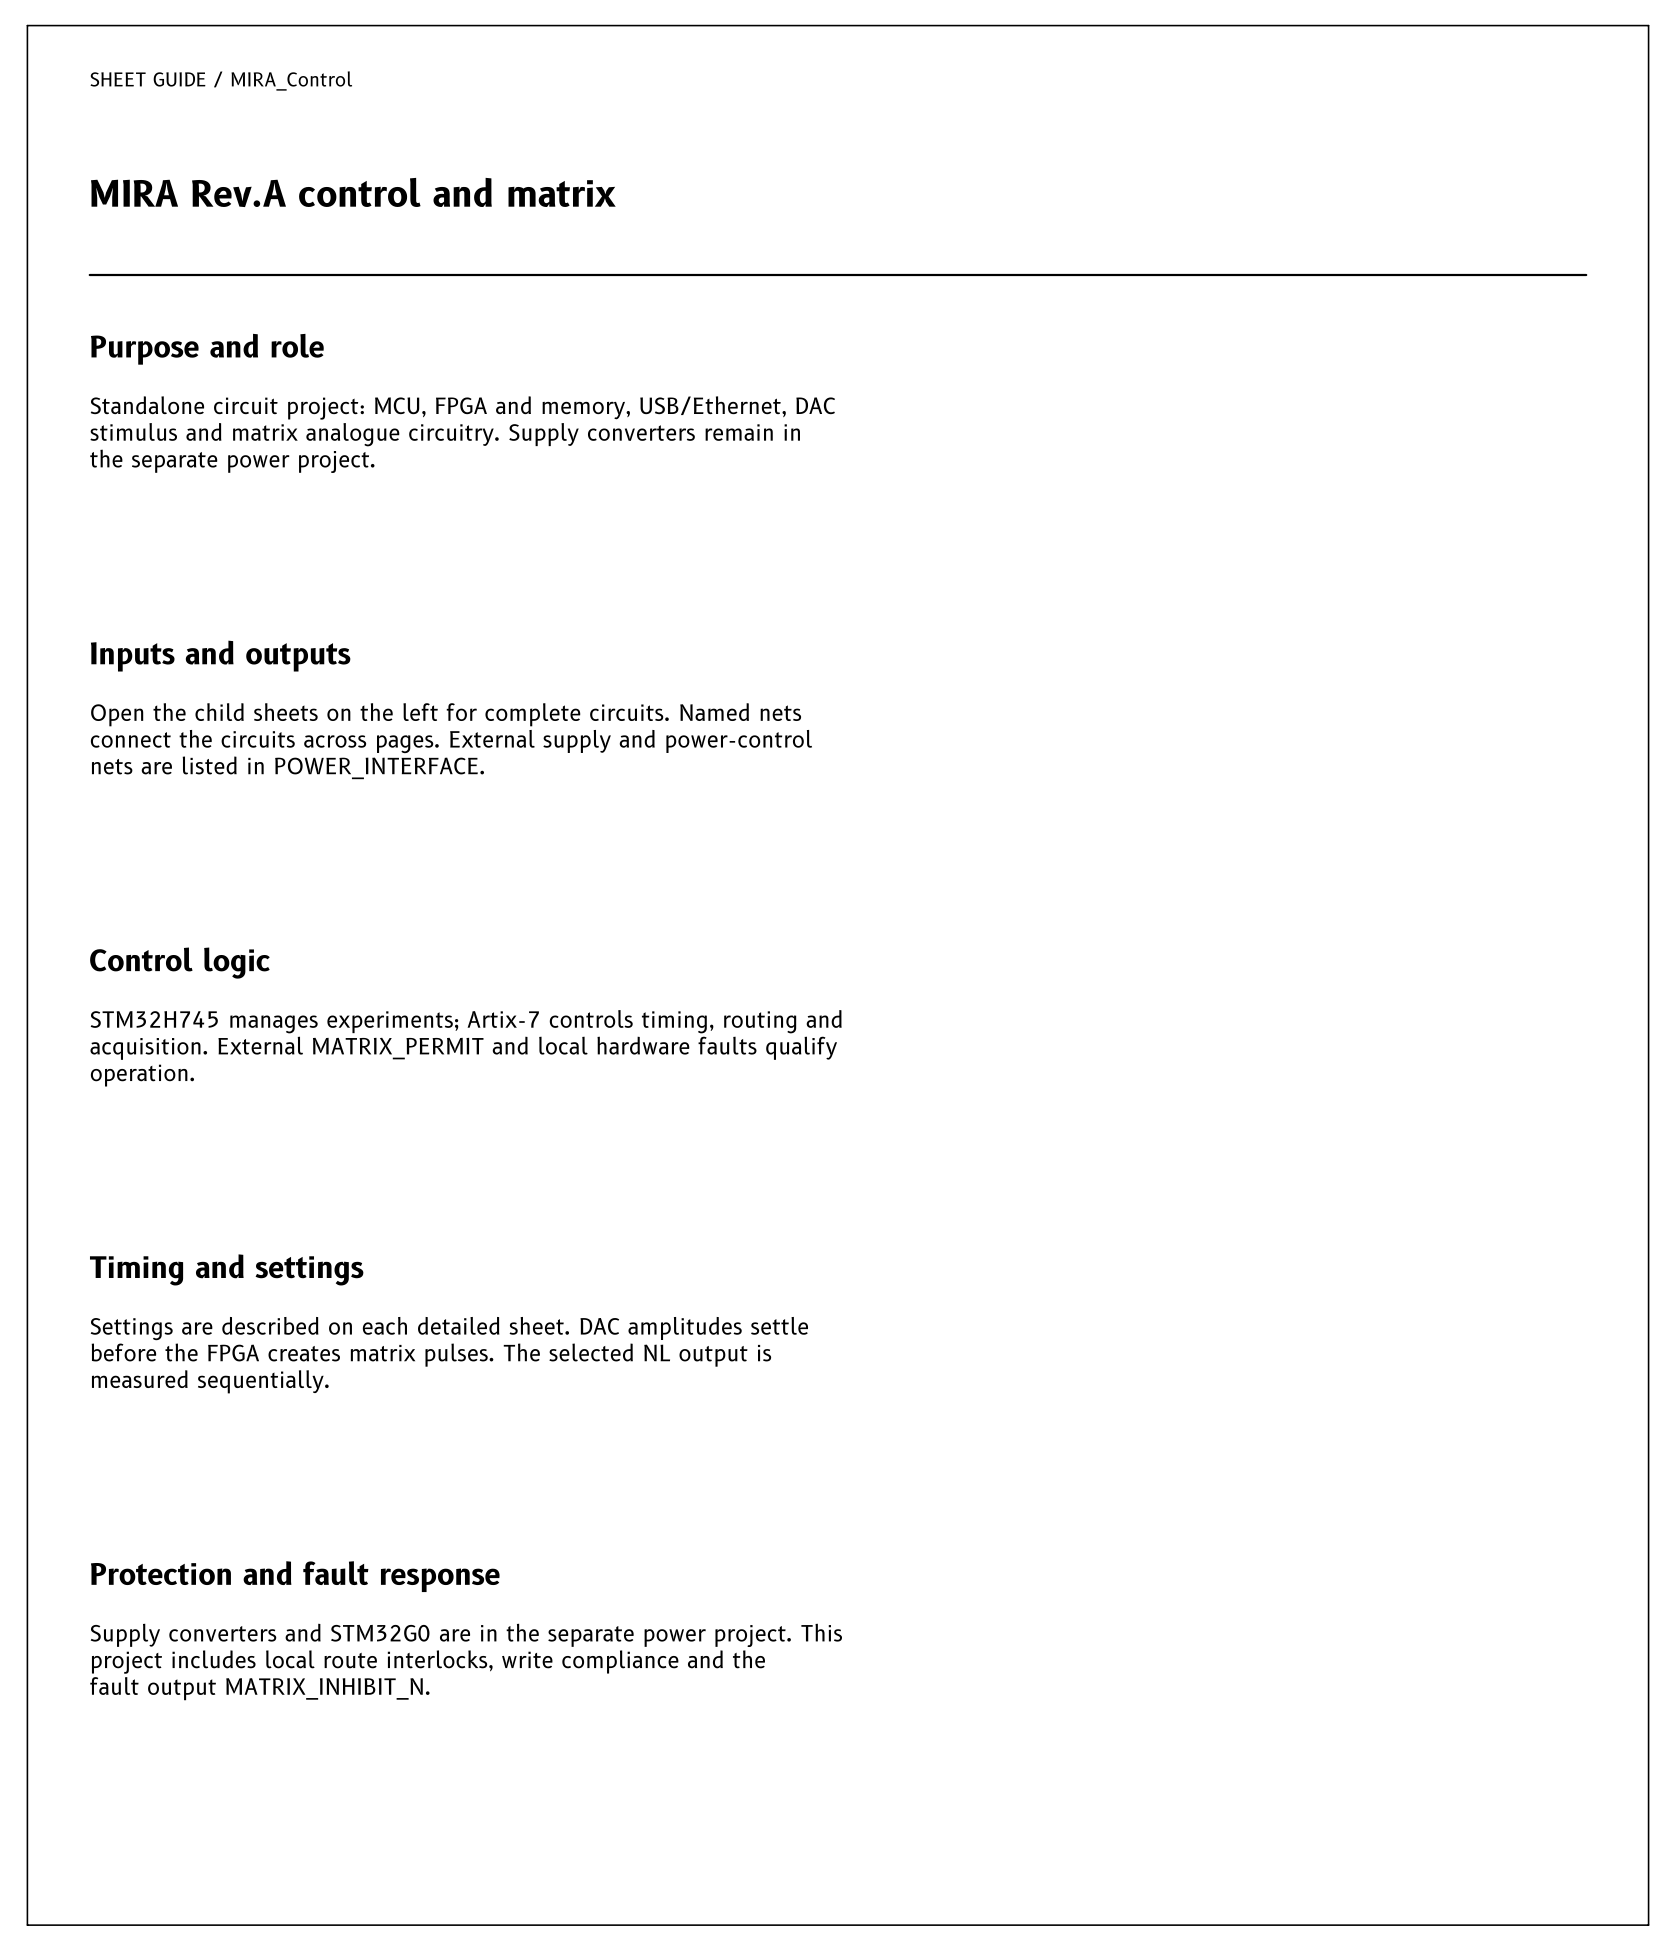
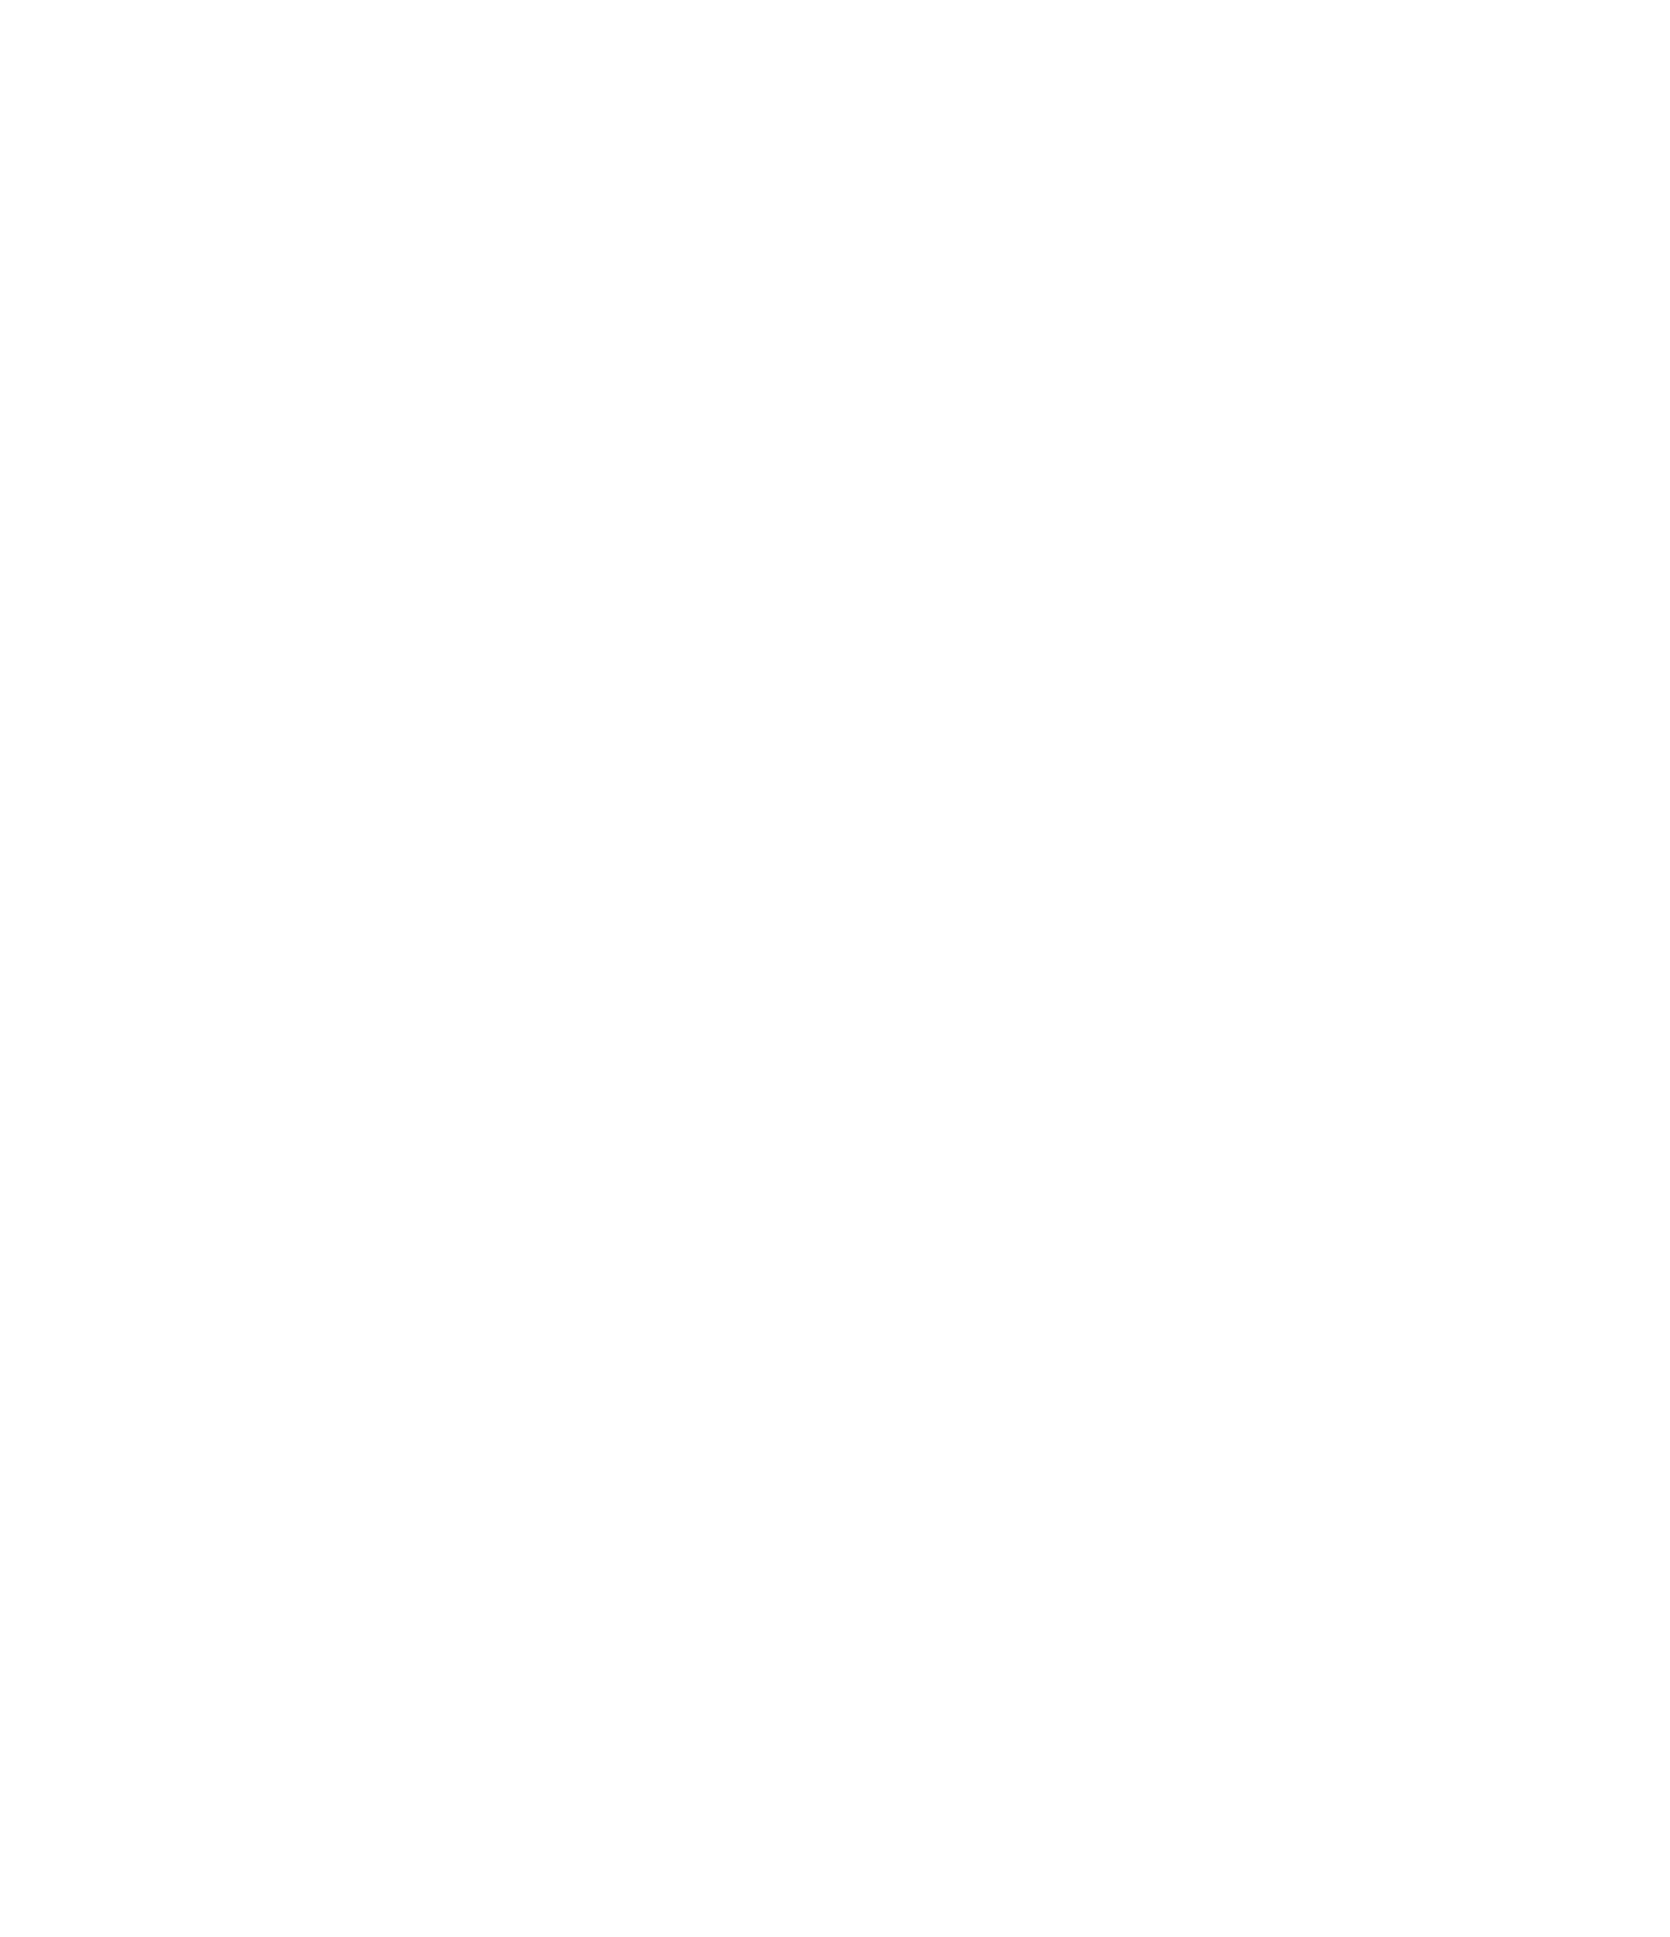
line: (27, 25) (1648, 25) (1648, 1925) (27, 1925) (27, 25) -> none
text: SHEET GUIDE / MIRA_Control (221, 80) -> none
text: MIRA Rev.A control and matrix (353, 192) -> none
line: (89, 275) (1586, 275) -> none
text: Purpose and role (207, 349) -> none
text: Standalone circuit project: MCU, FPGA and memory, USB/Ethernet, DAC (462, 407) -> none
text: stimulus and matrix analogue circuitry. Supply converters remain in (445, 434) -> none
text: the separate power project. (232, 461) -> none
text: Inputs and outputs (220, 656) -> none
text: Open the child sheets on the left for complete circuits. Named nets (446, 714) -> none
text: connect the circuits across pages. External supply and power-control (451, 741) -> none
text: nets are listed in POWER_INTERFACE. (287, 767) -> none
text: Control logic (179, 963) -> none
text: STM32H745 manages experiments; Artix-7 controls timing, routing and (466, 1021) -> none
text: acquisition. External MATRIX_PERMIT and local hardware faults qualify (463, 1048) -> none
text: operation. (142, 1075) -> none
text: Timing and settings (226, 1269) -> none
text: Settings are described on each detailed sheet. DAC amplitudes settle (449, 1328) -> none
text: before the FPGA creates matrix pulses. The selected NL output is (431, 1355) -> none
text: measured sequentially. (210, 1381) -> none
text: Protection and fault response (295, 1576) -> none
text: Supply converters and STM32G0 are in the separate power project. This (466, 1635) -> none
text: project includes local route interlocks, write compliance and the (428, 1662) -> none
text: fault output MATRIX_INHIBIT_N. (259, 1688) -> none

